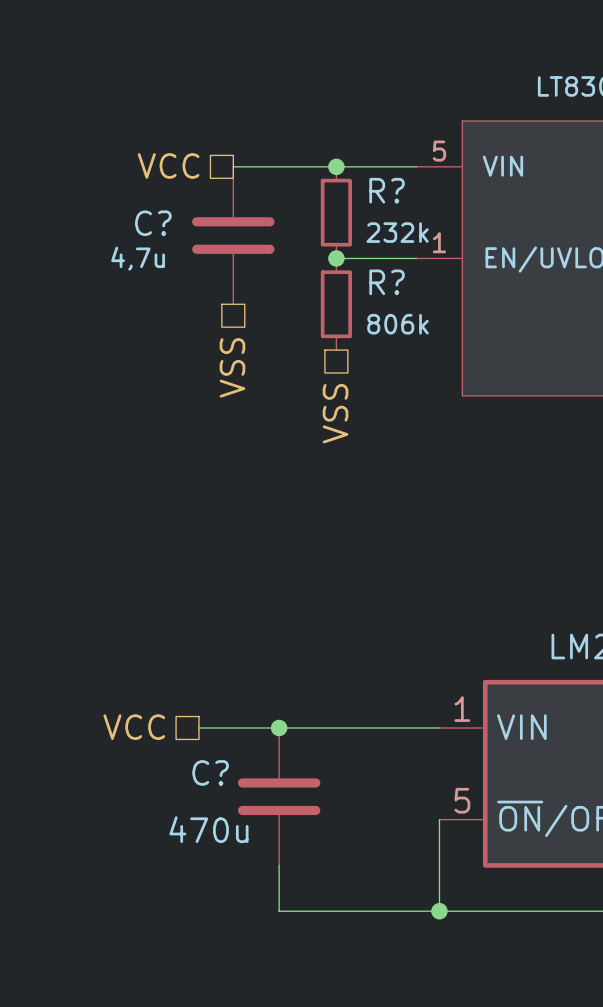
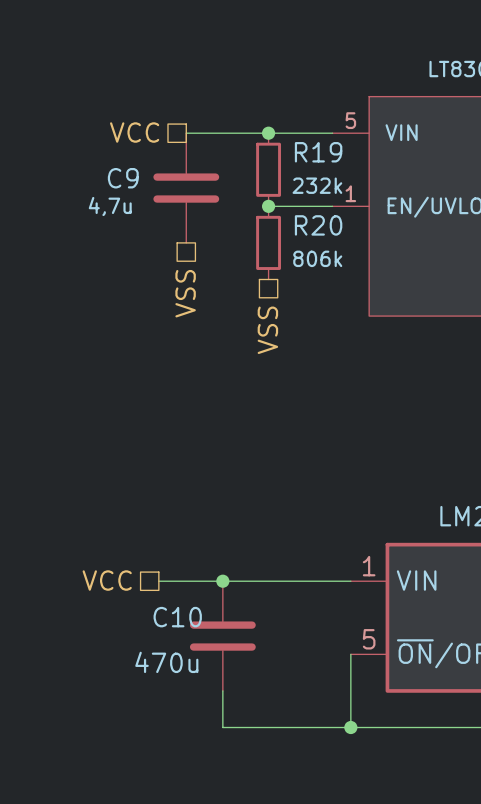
R? name: R? (387, 190) -> R19 (318, 152)
C? name: C? (153, 223) -> C9 (123, 178)
R? name: R? (387, 282) -> R20 (318, 225)
C? name: C? (210, 772) -> C10 (177, 617)

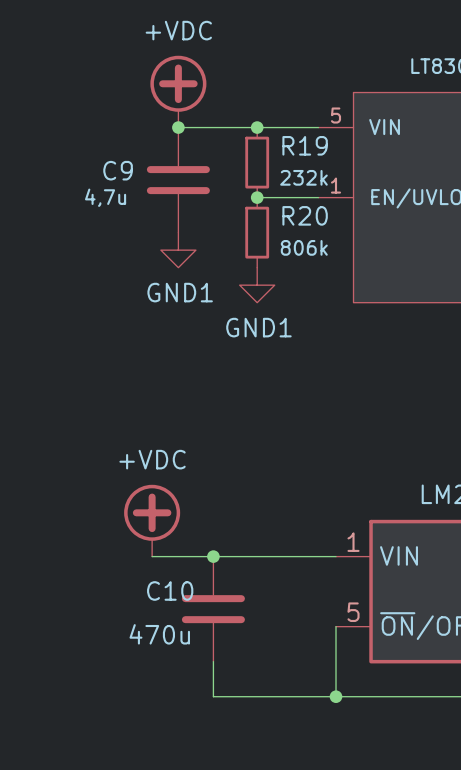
power symbol: none -> +VDC (178, 91)
hierarchical label: VCC (134, 132) -> none
junction: none -> (178, 127)
power symbol: none -> GND1 (178, 250)
hierarchical label: VSS (185, 293) -> none
power symbol: none -> GND1 (257, 285)
hierarchical label: VSS (267, 330) -> none
power symbol: none -> +VDC (152, 520)
hierarchical label: VCC (107, 580) -> none

